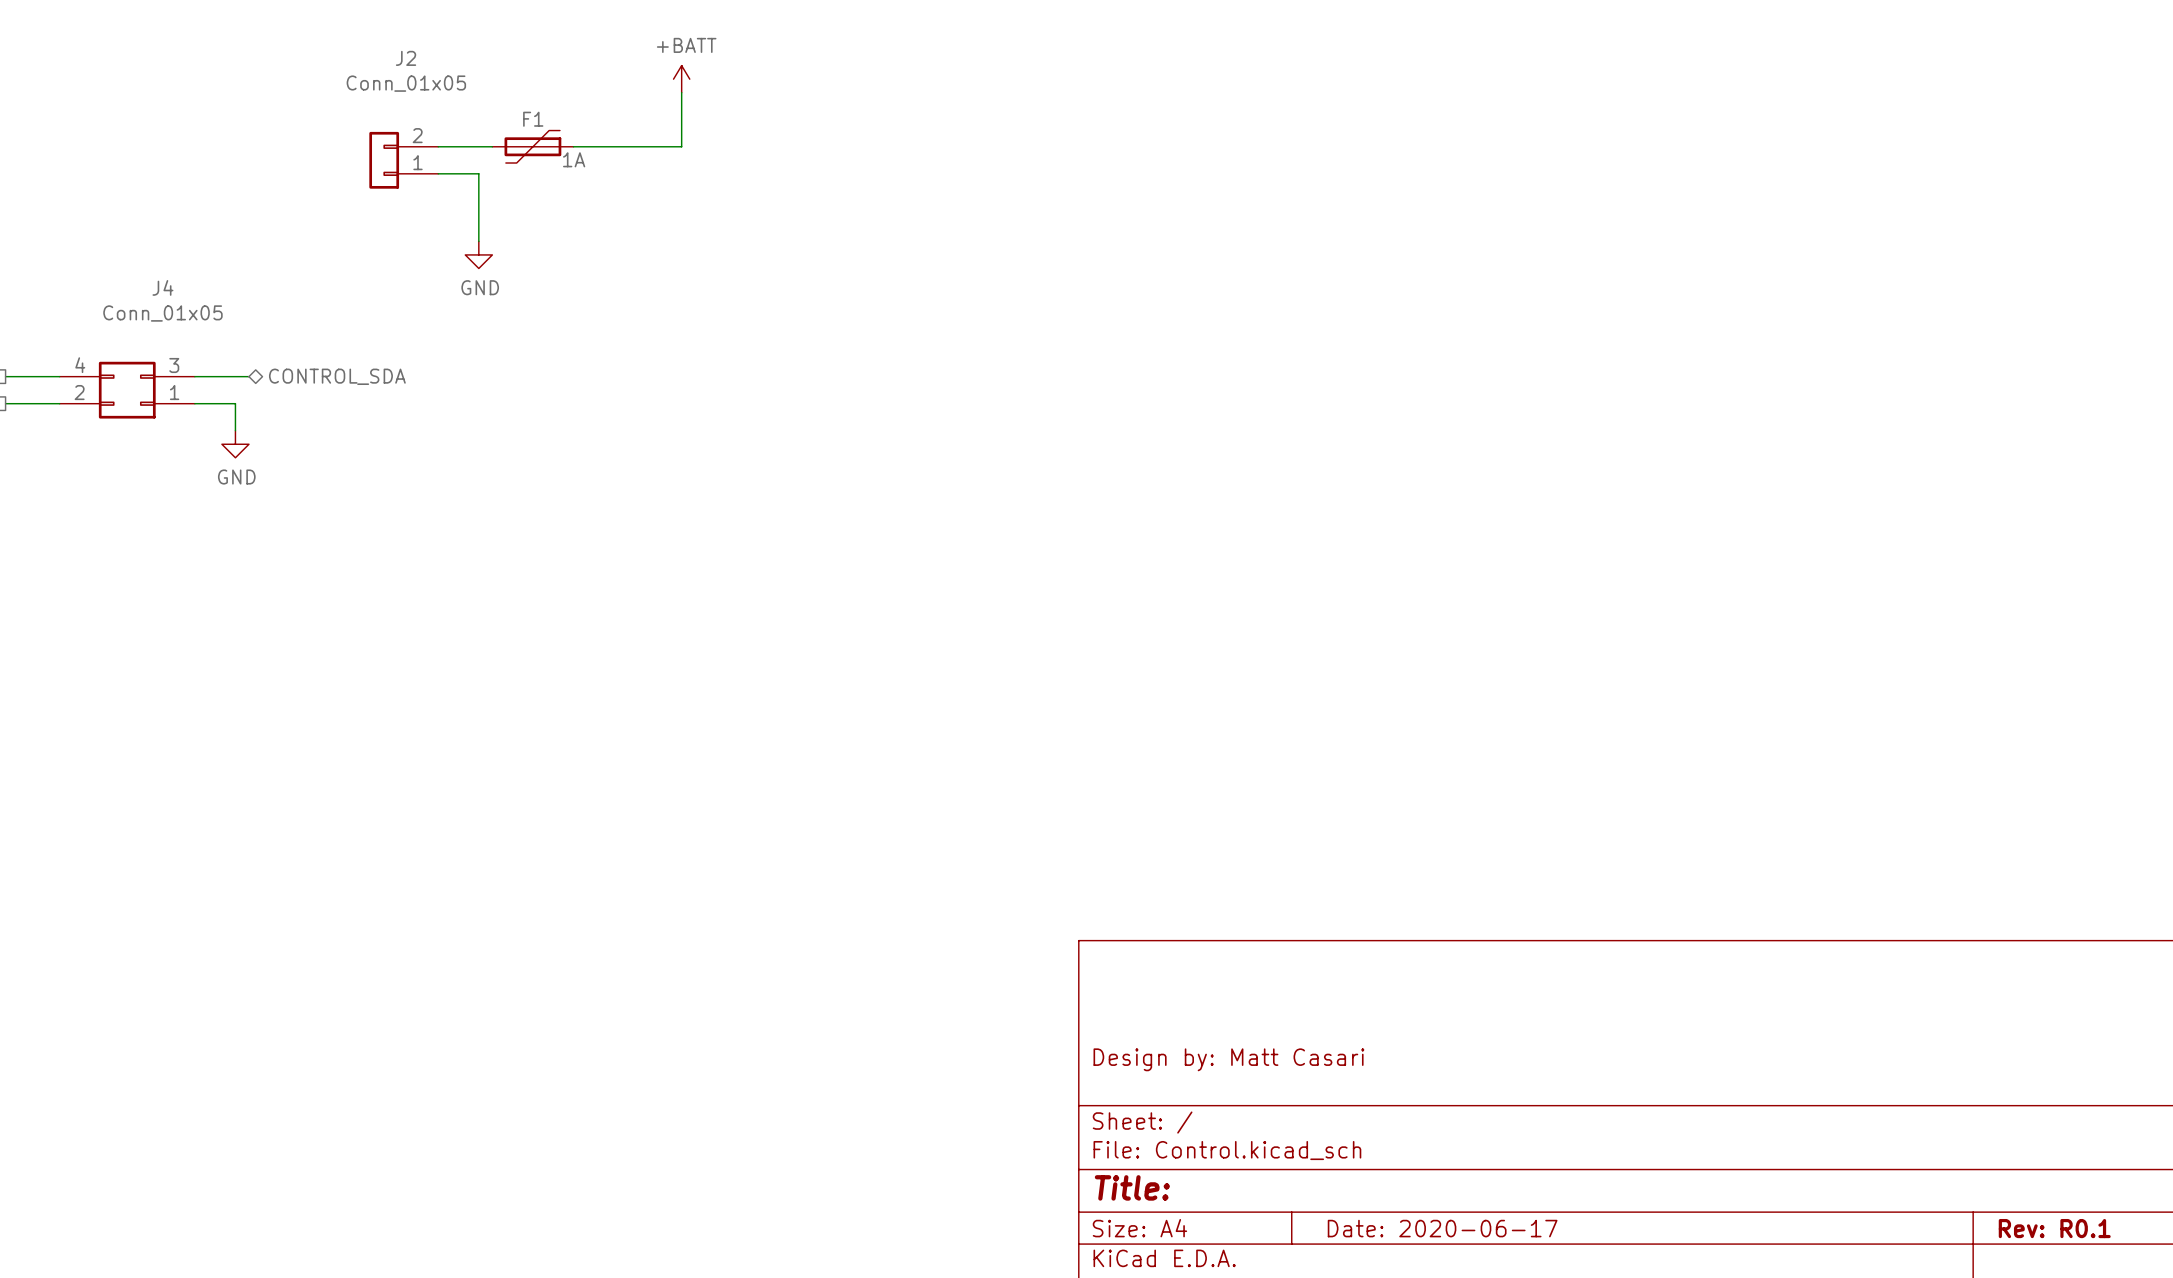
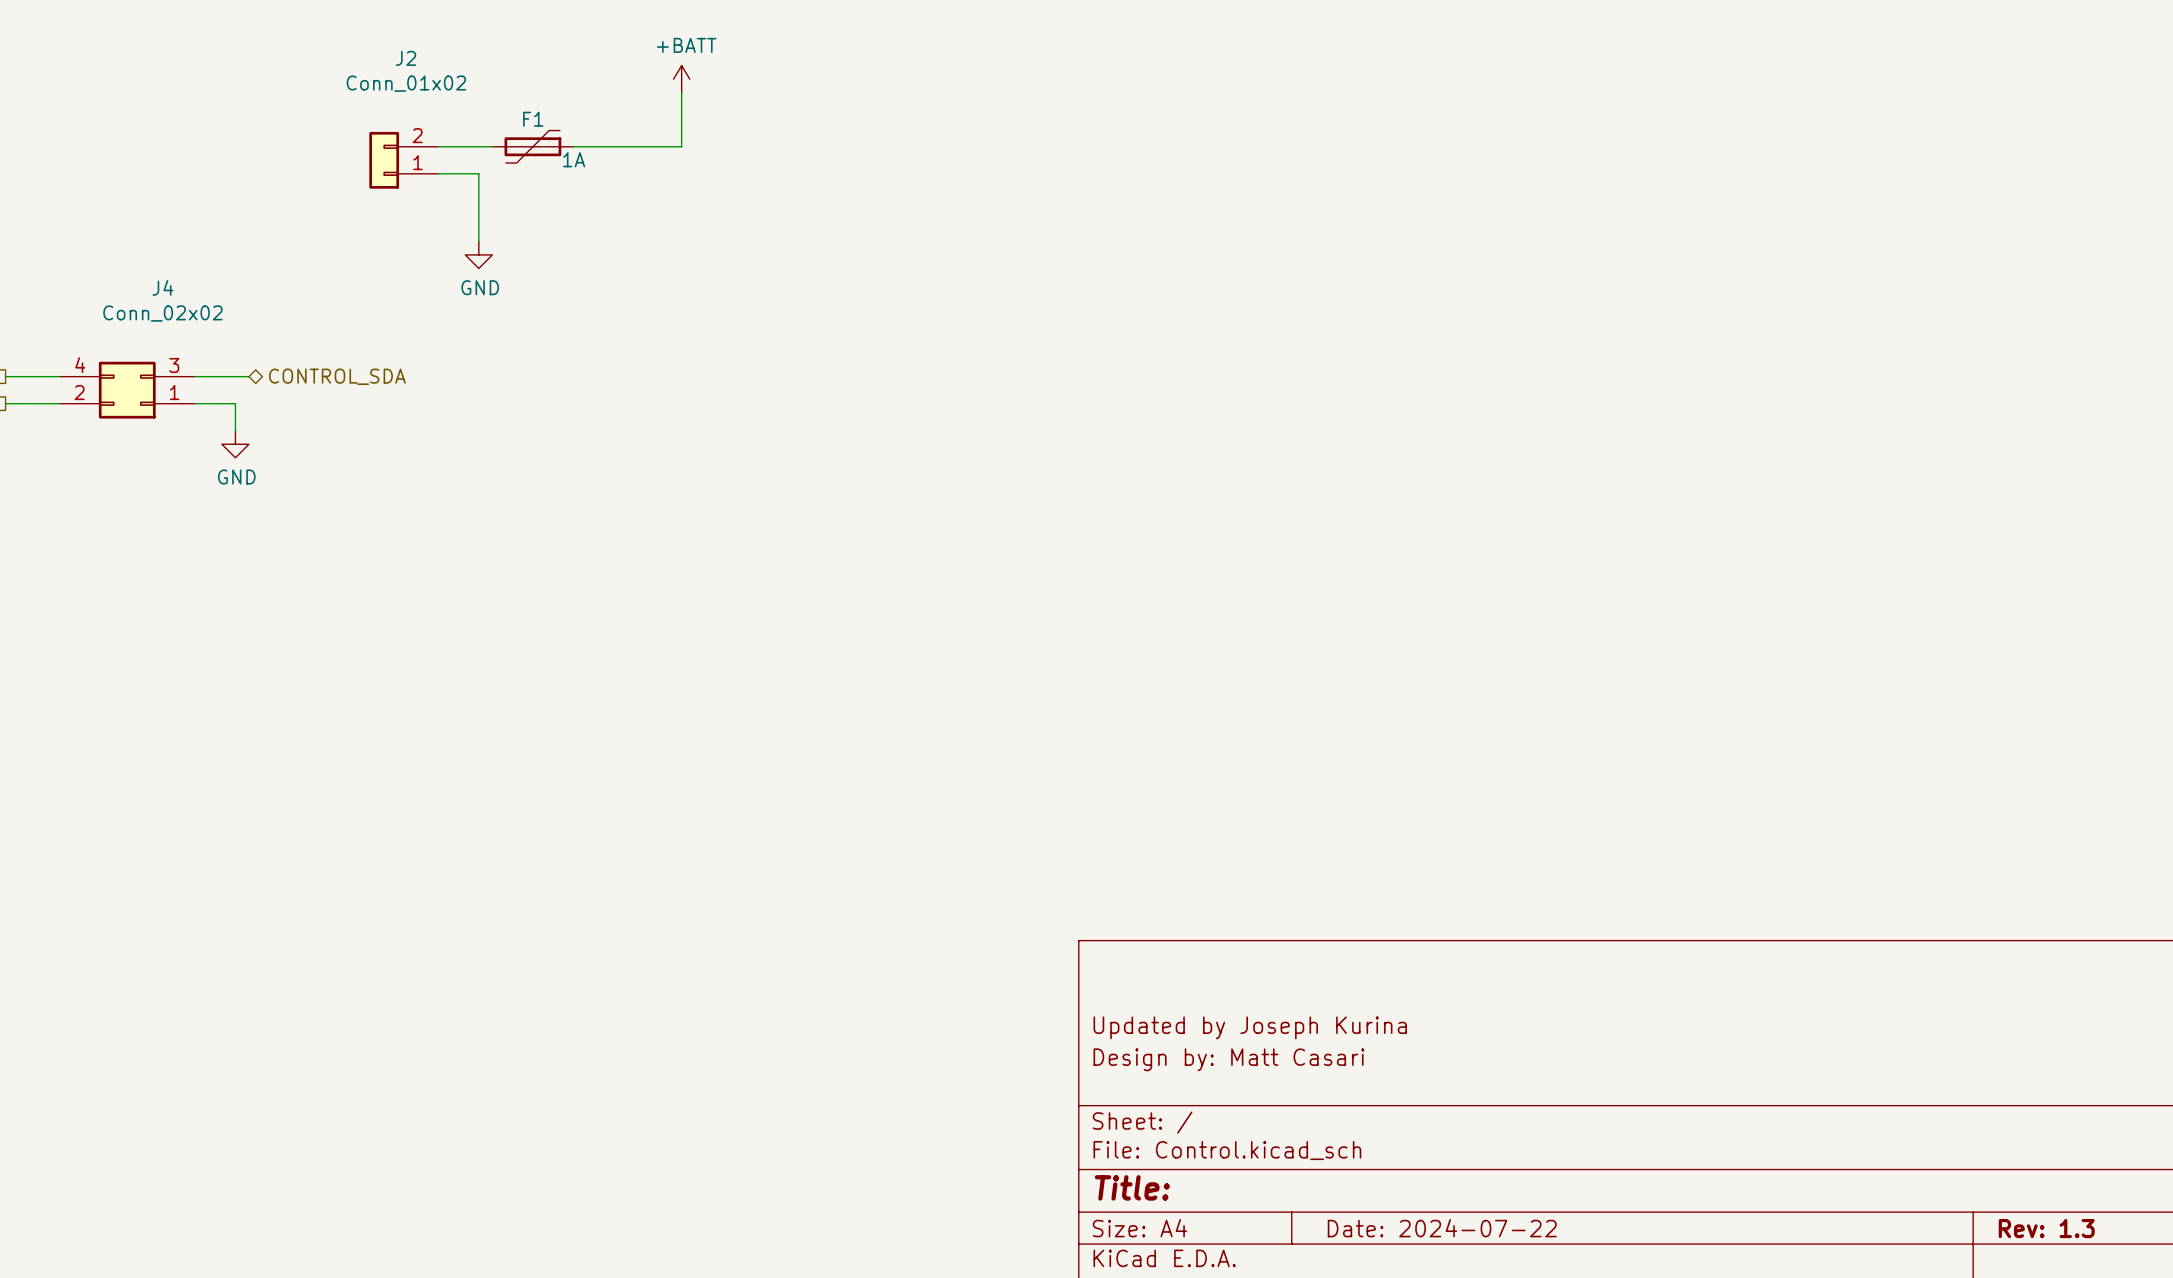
J2 value: Conn_01x05 (406, 83) -> Conn_01x02 (406, 83)
J4 value: Conn_01x05 (162, 313) -> Conn_02x02 (162, 313)
title block: none -> Updated by Joseph Kurina (1250, 1027)
title block: Date: 2020-06-17 (1442, 1228) -> Date: 2024-07-22 (1442, 1228)
title block: Rev: R0.1 (2054, 1228) -> Rev: 1.3 (2046, 1228)

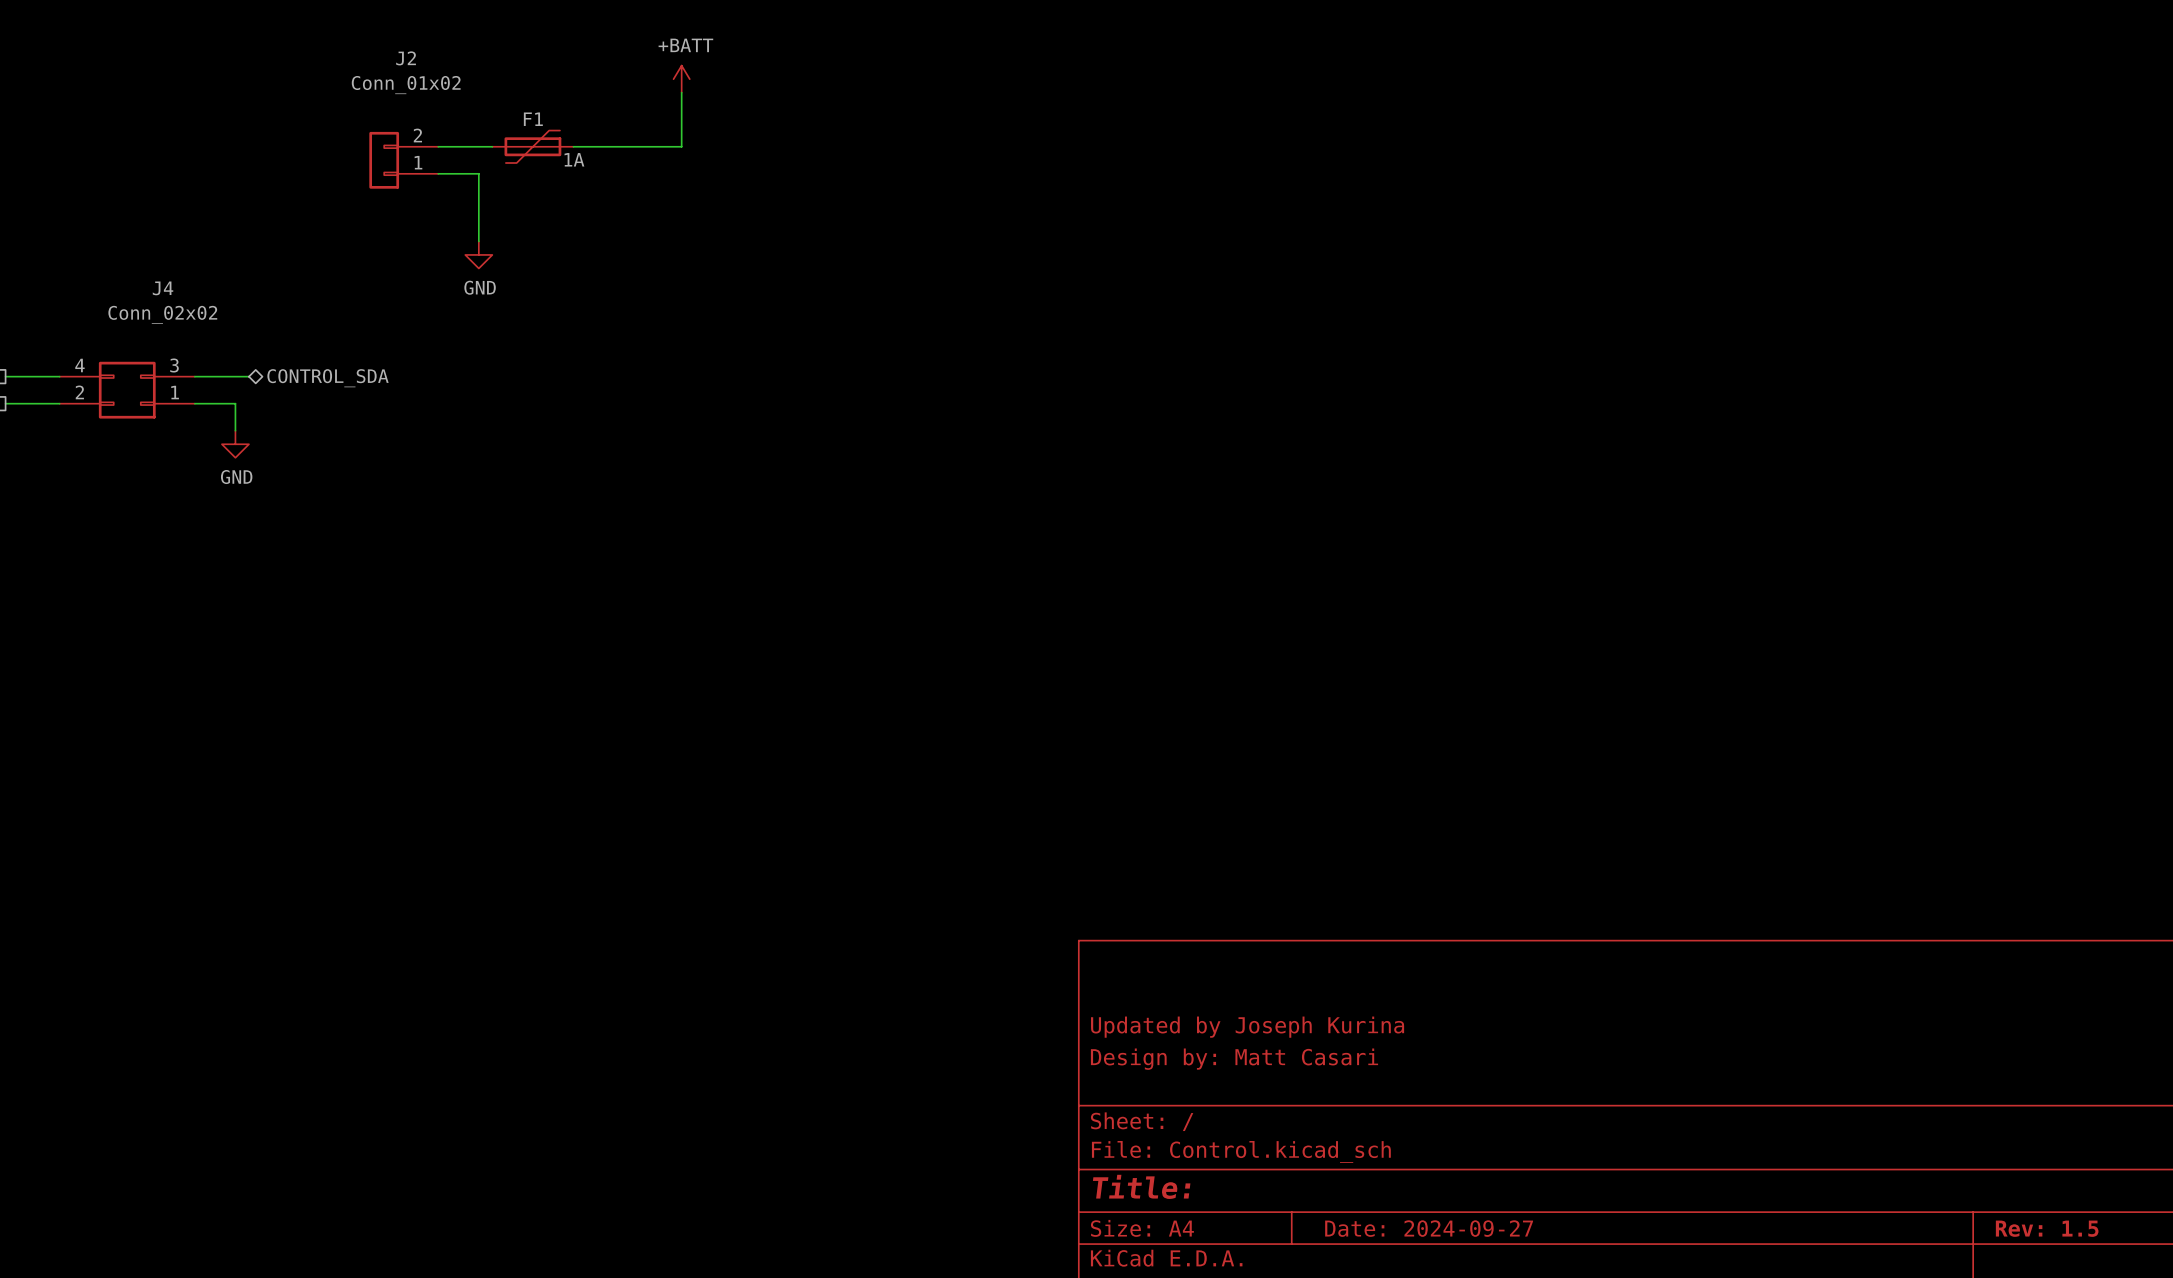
title block: Date: 2024-07-22 (1442, 1228) -> Date: 2024-09-27 (1429, 1228)
title block: Rev: 1.3 (2046, 1228) -> Rev: 1.5 (2047, 1228)

